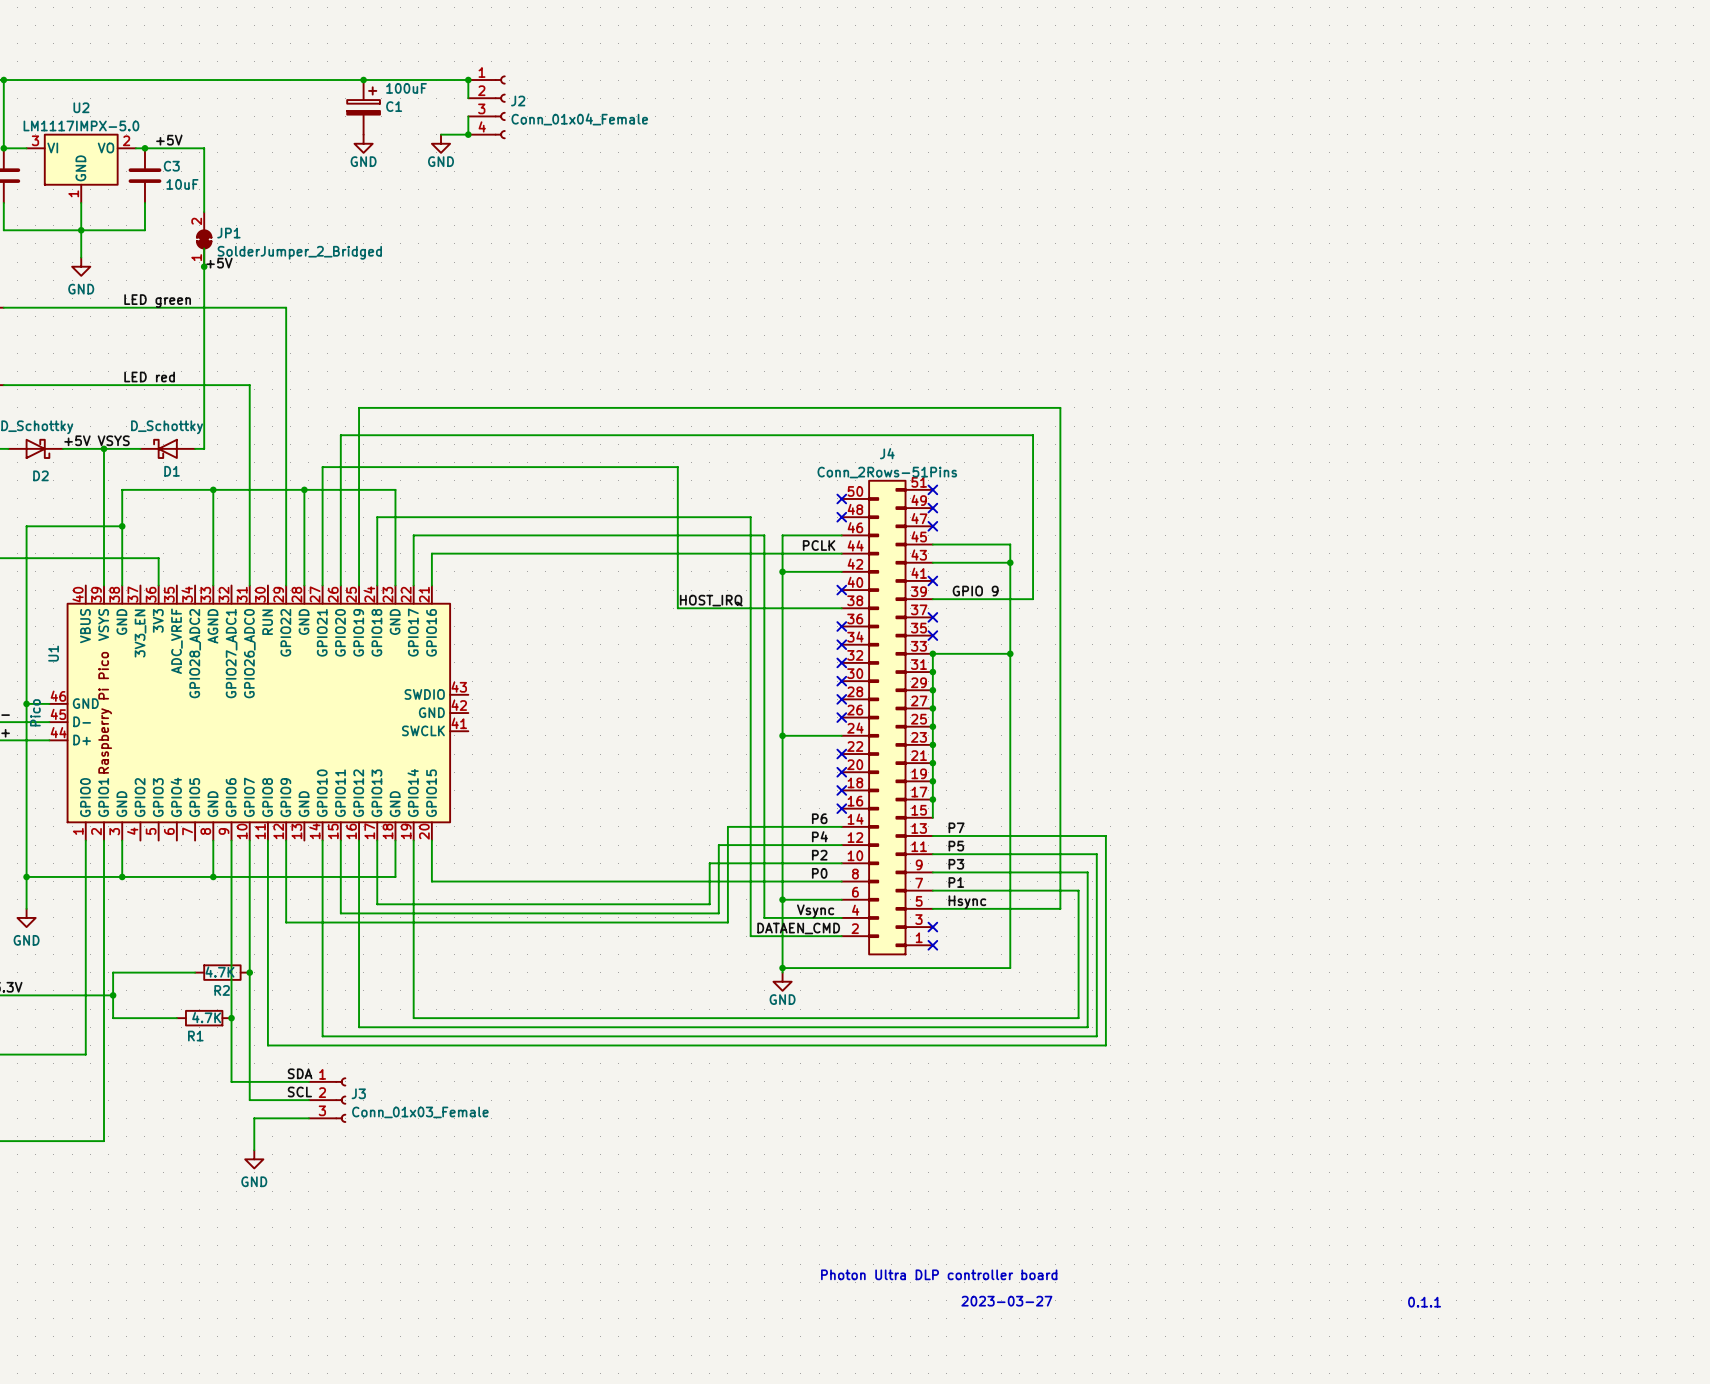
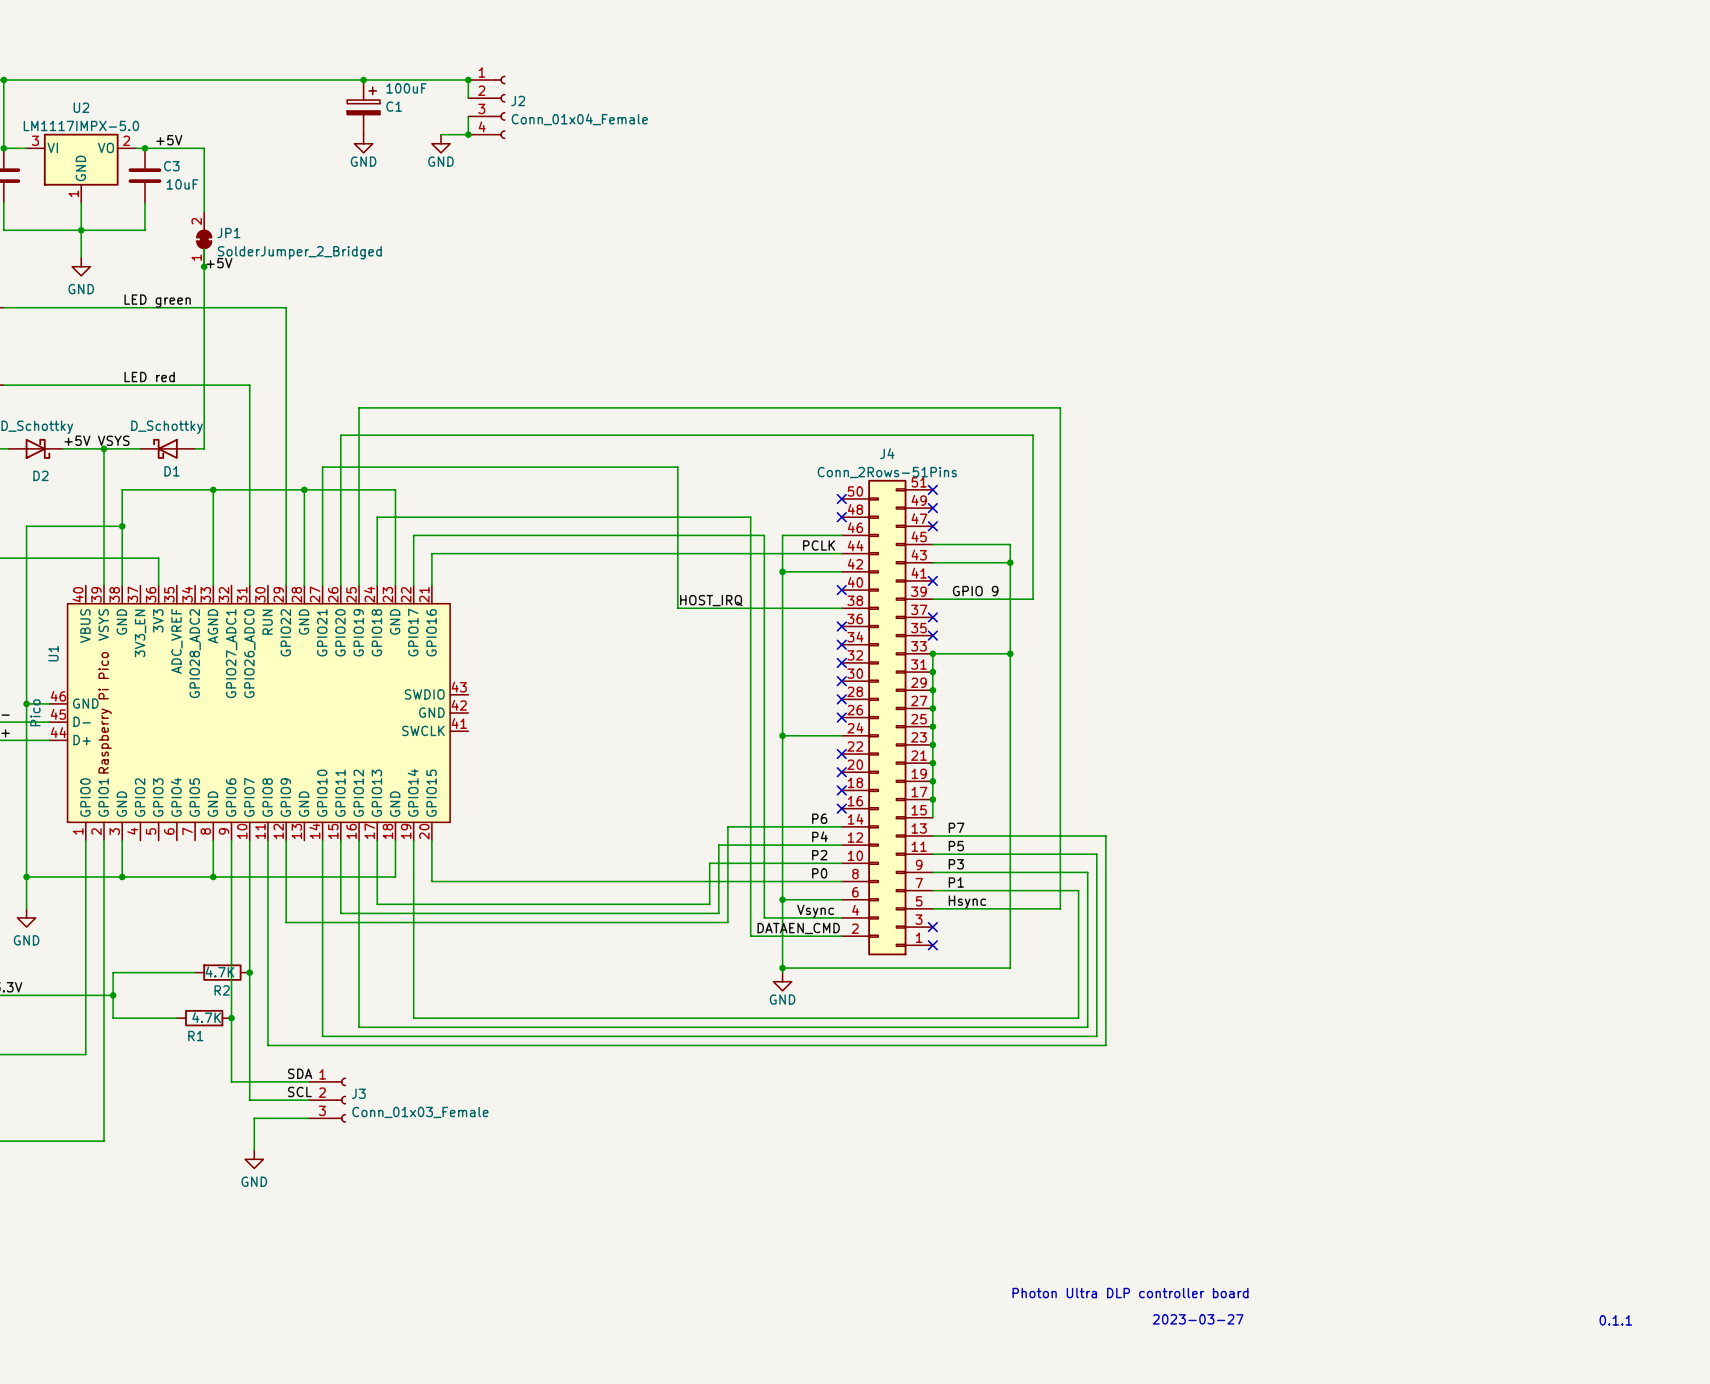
text: Photon Ultra DLP controller board (939, 1274) -> none
text: none -> Photon Ultra DLP controller board (1130, 1293)
text: 2023-03-27 (1006, 1301) -> none
text: 0.1.1 (1424, 1302) -> none
text: none -> 2023-03-27 (1198, 1319)
text: none -> 0.1.1 (1615, 1320)

